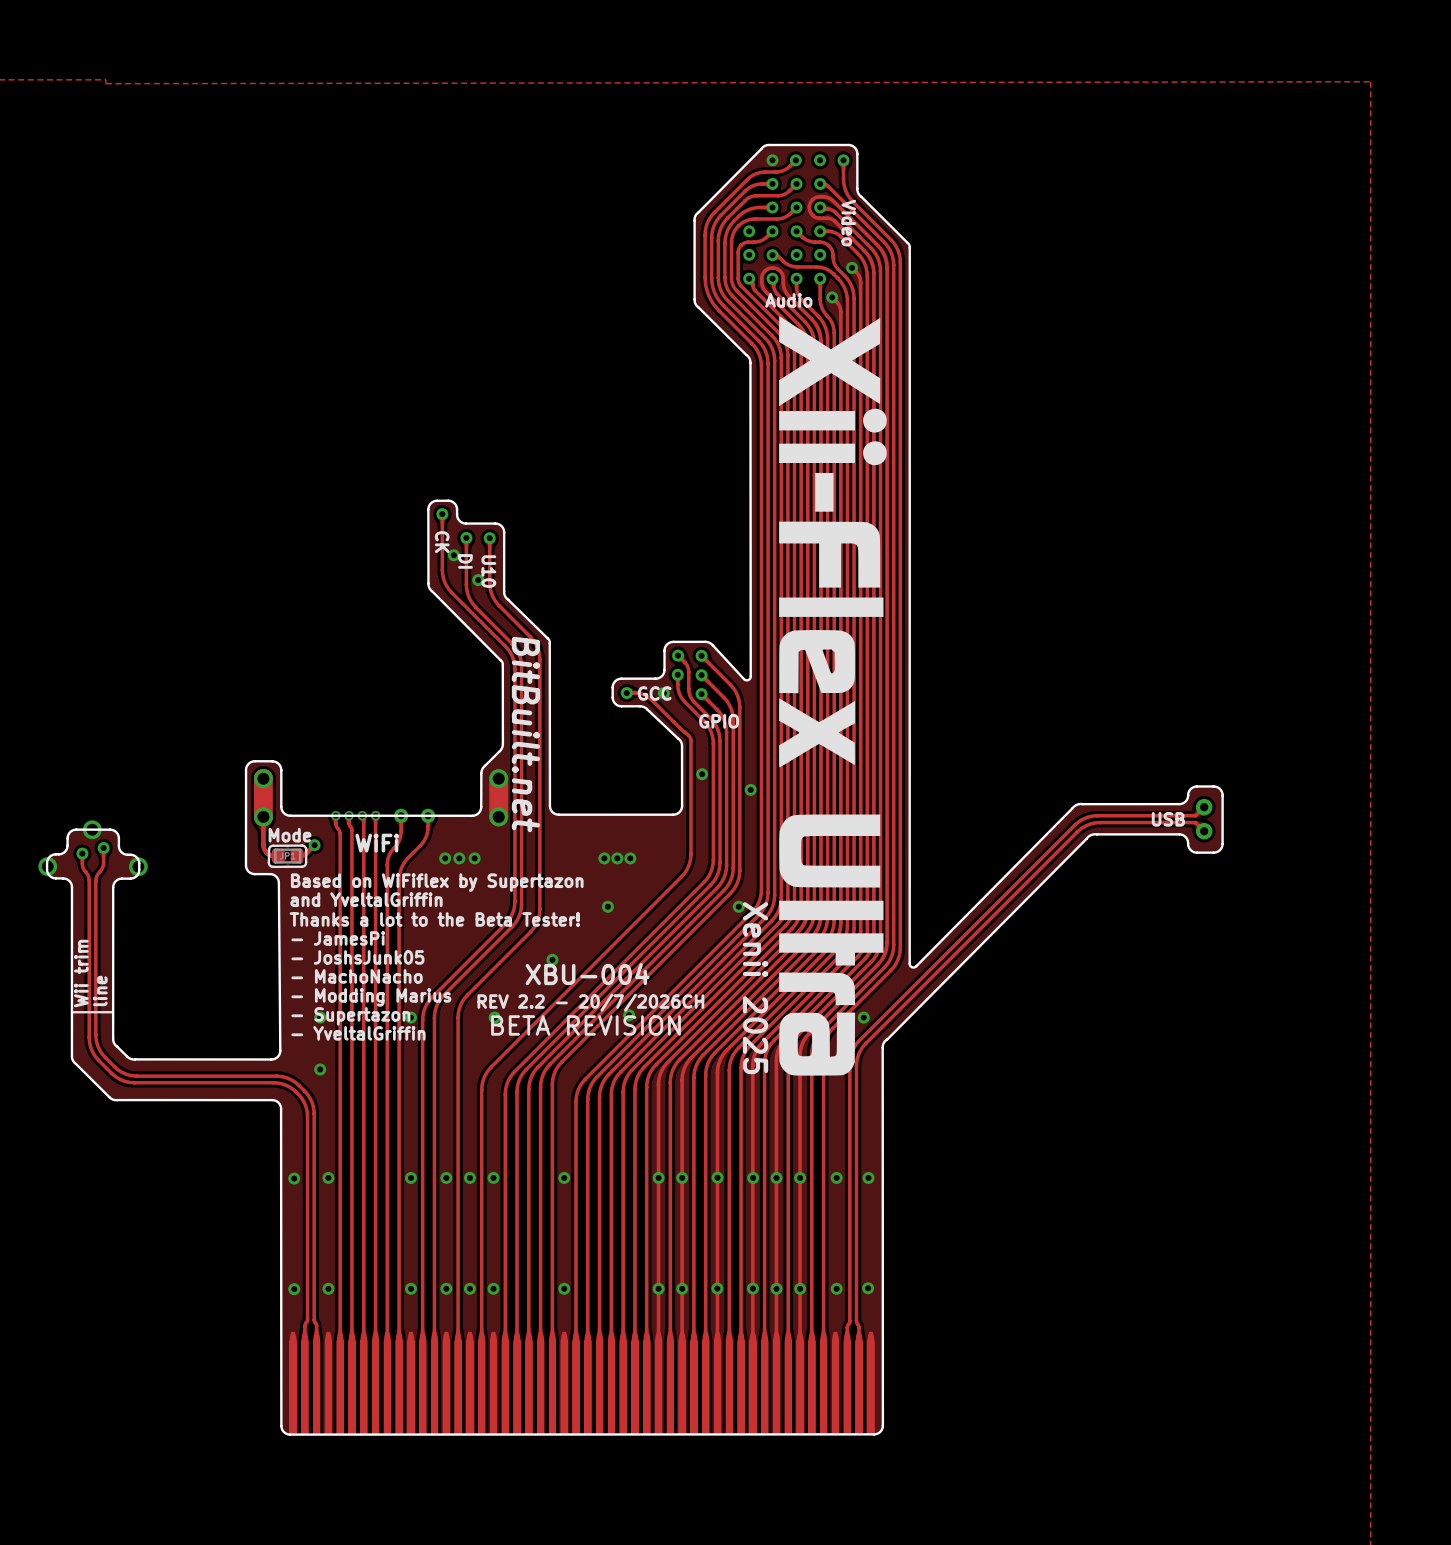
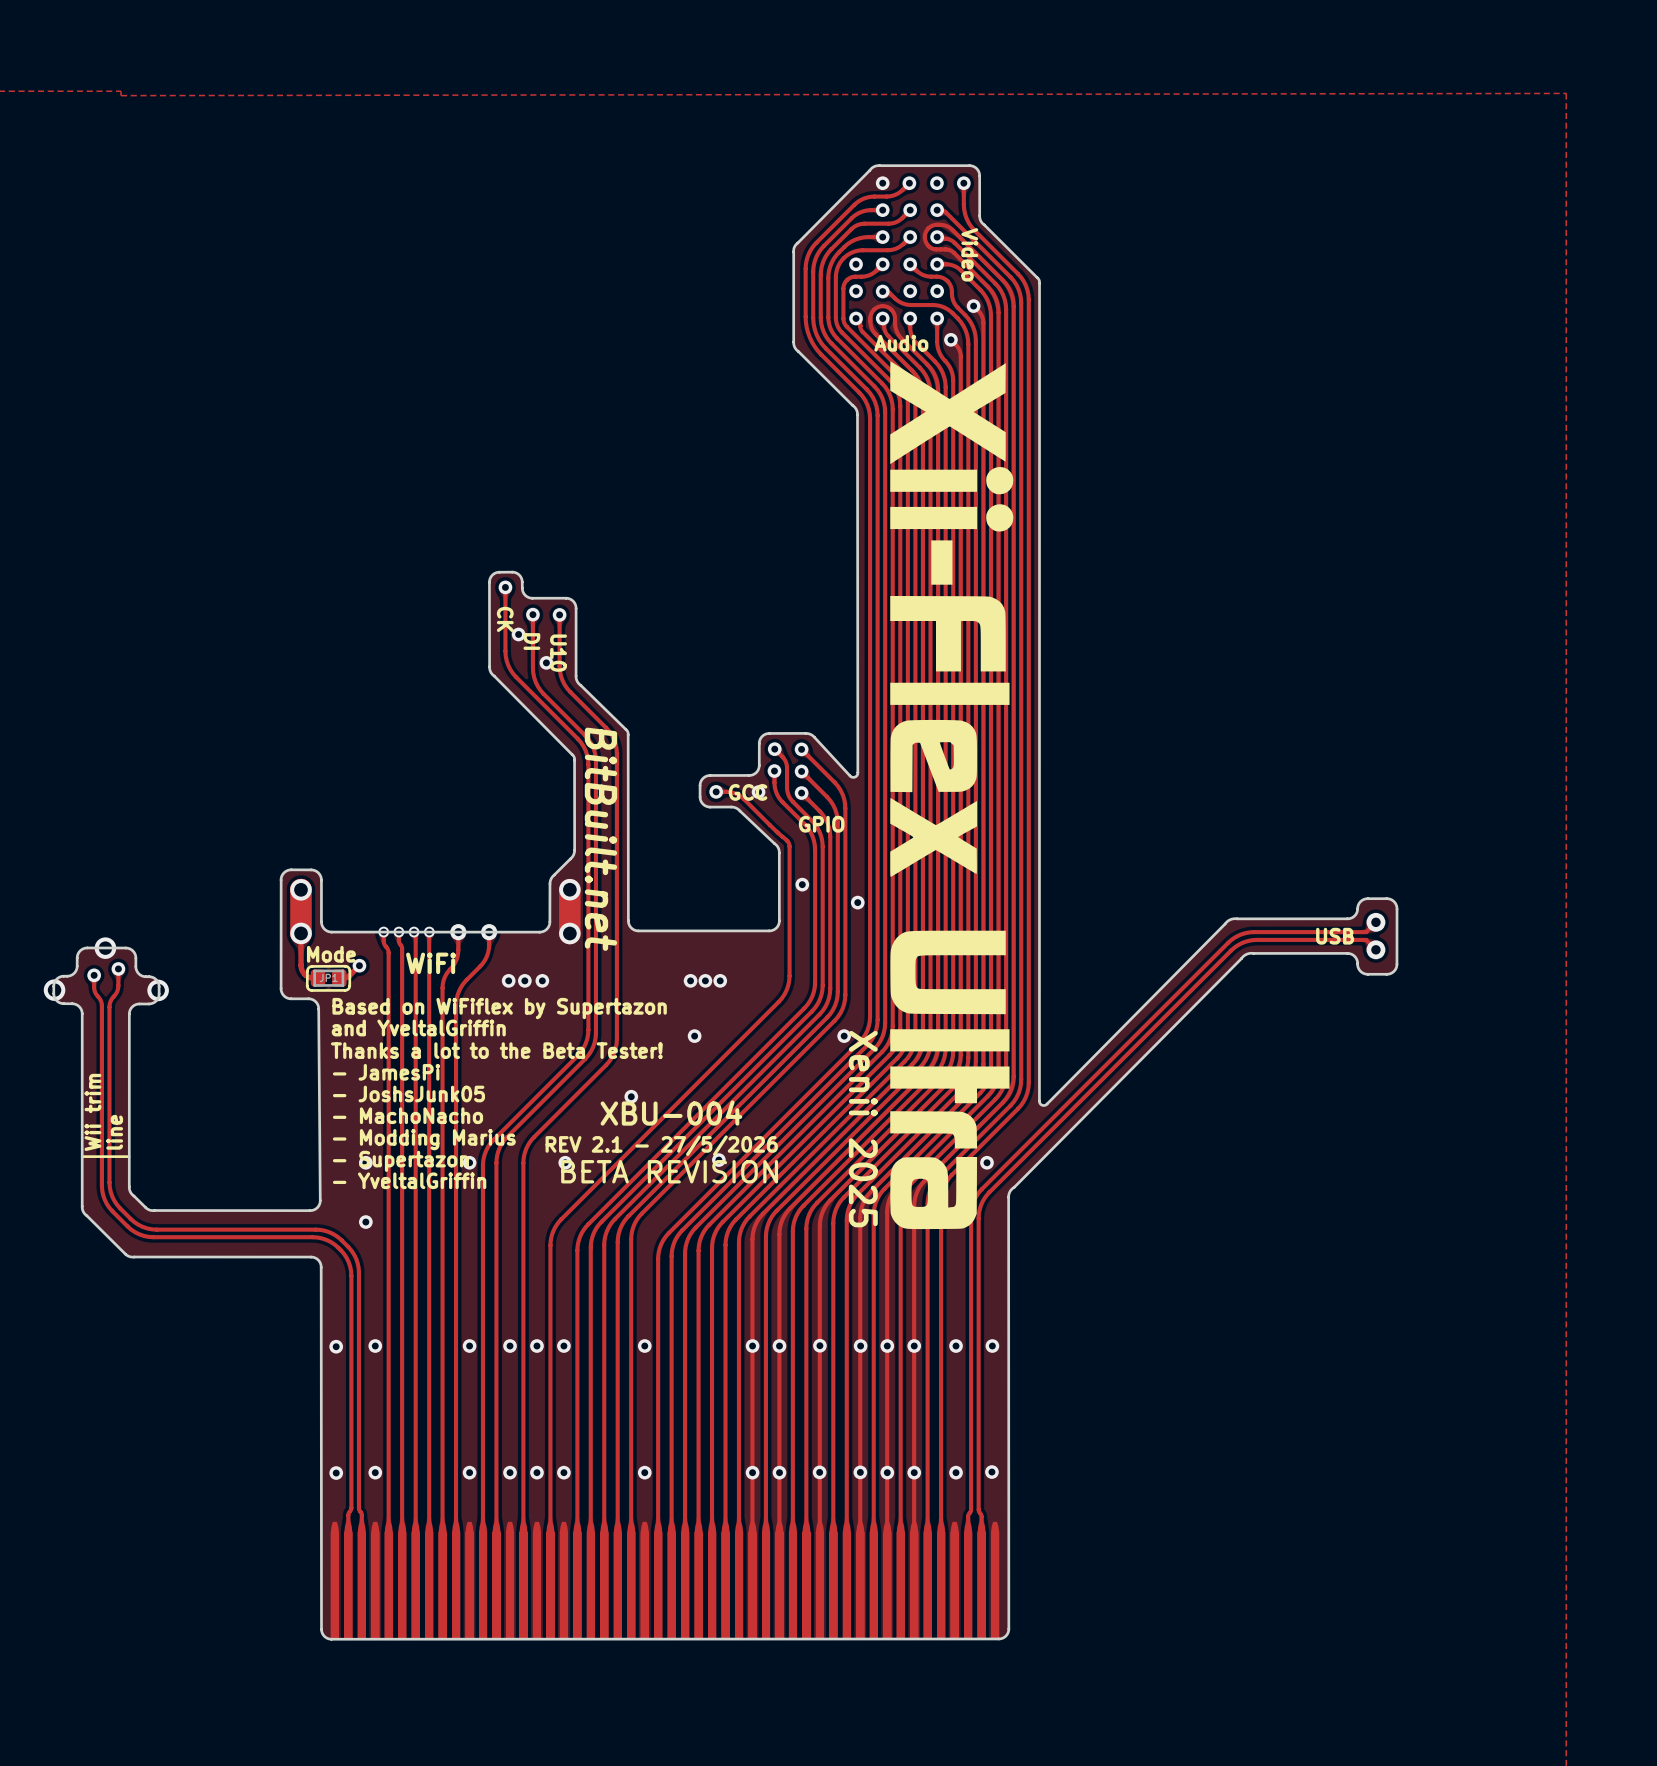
text: REV 2.2 - 20/7/2026CH (590, 1002) -> REV 2.1 - 27/5/2026 (661, 1145)

